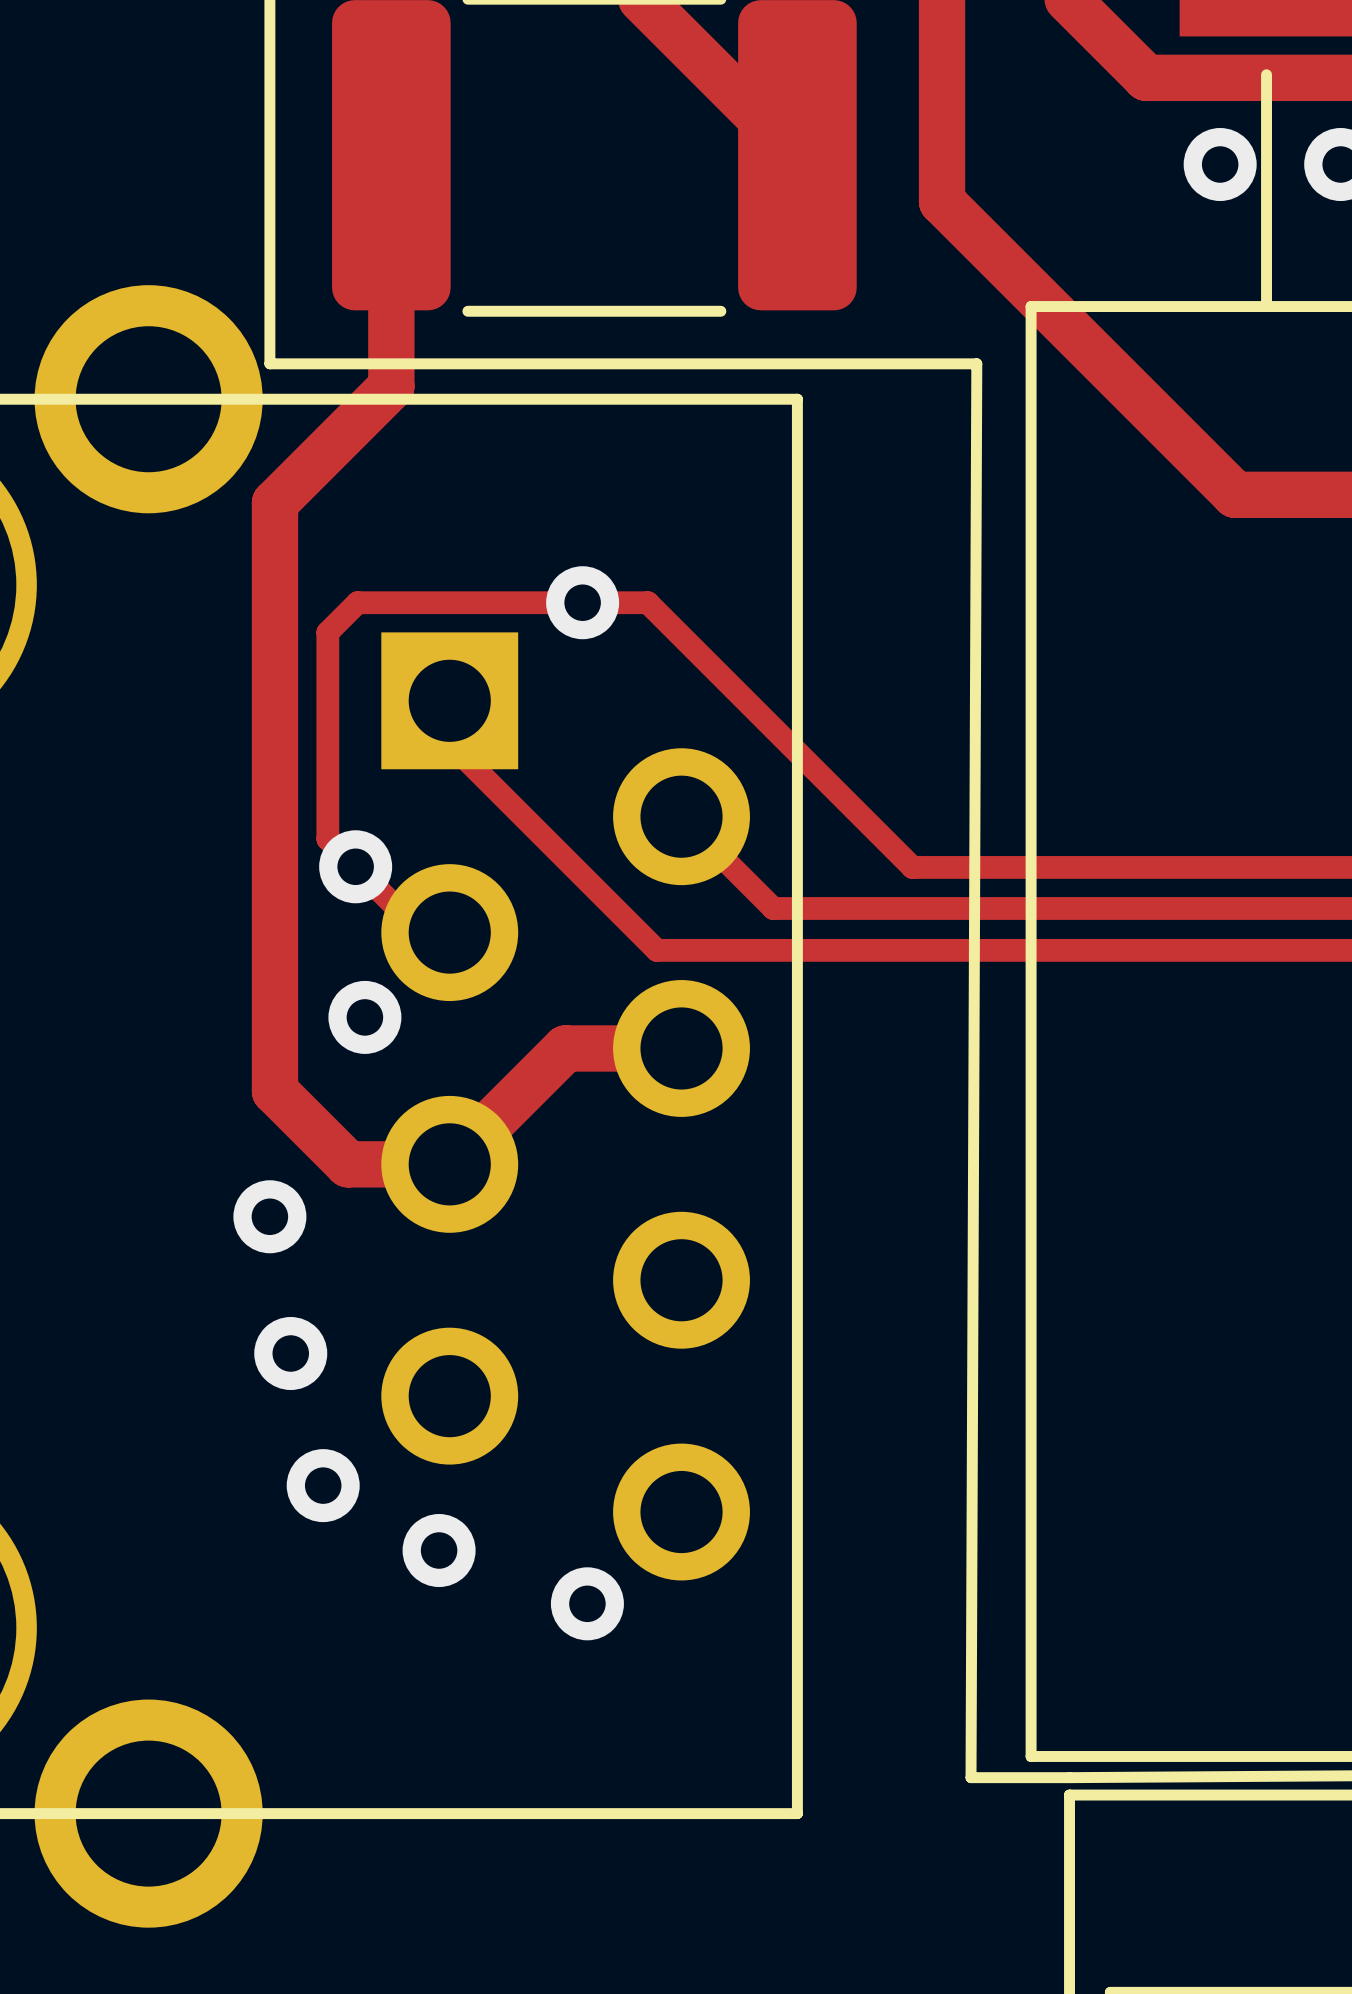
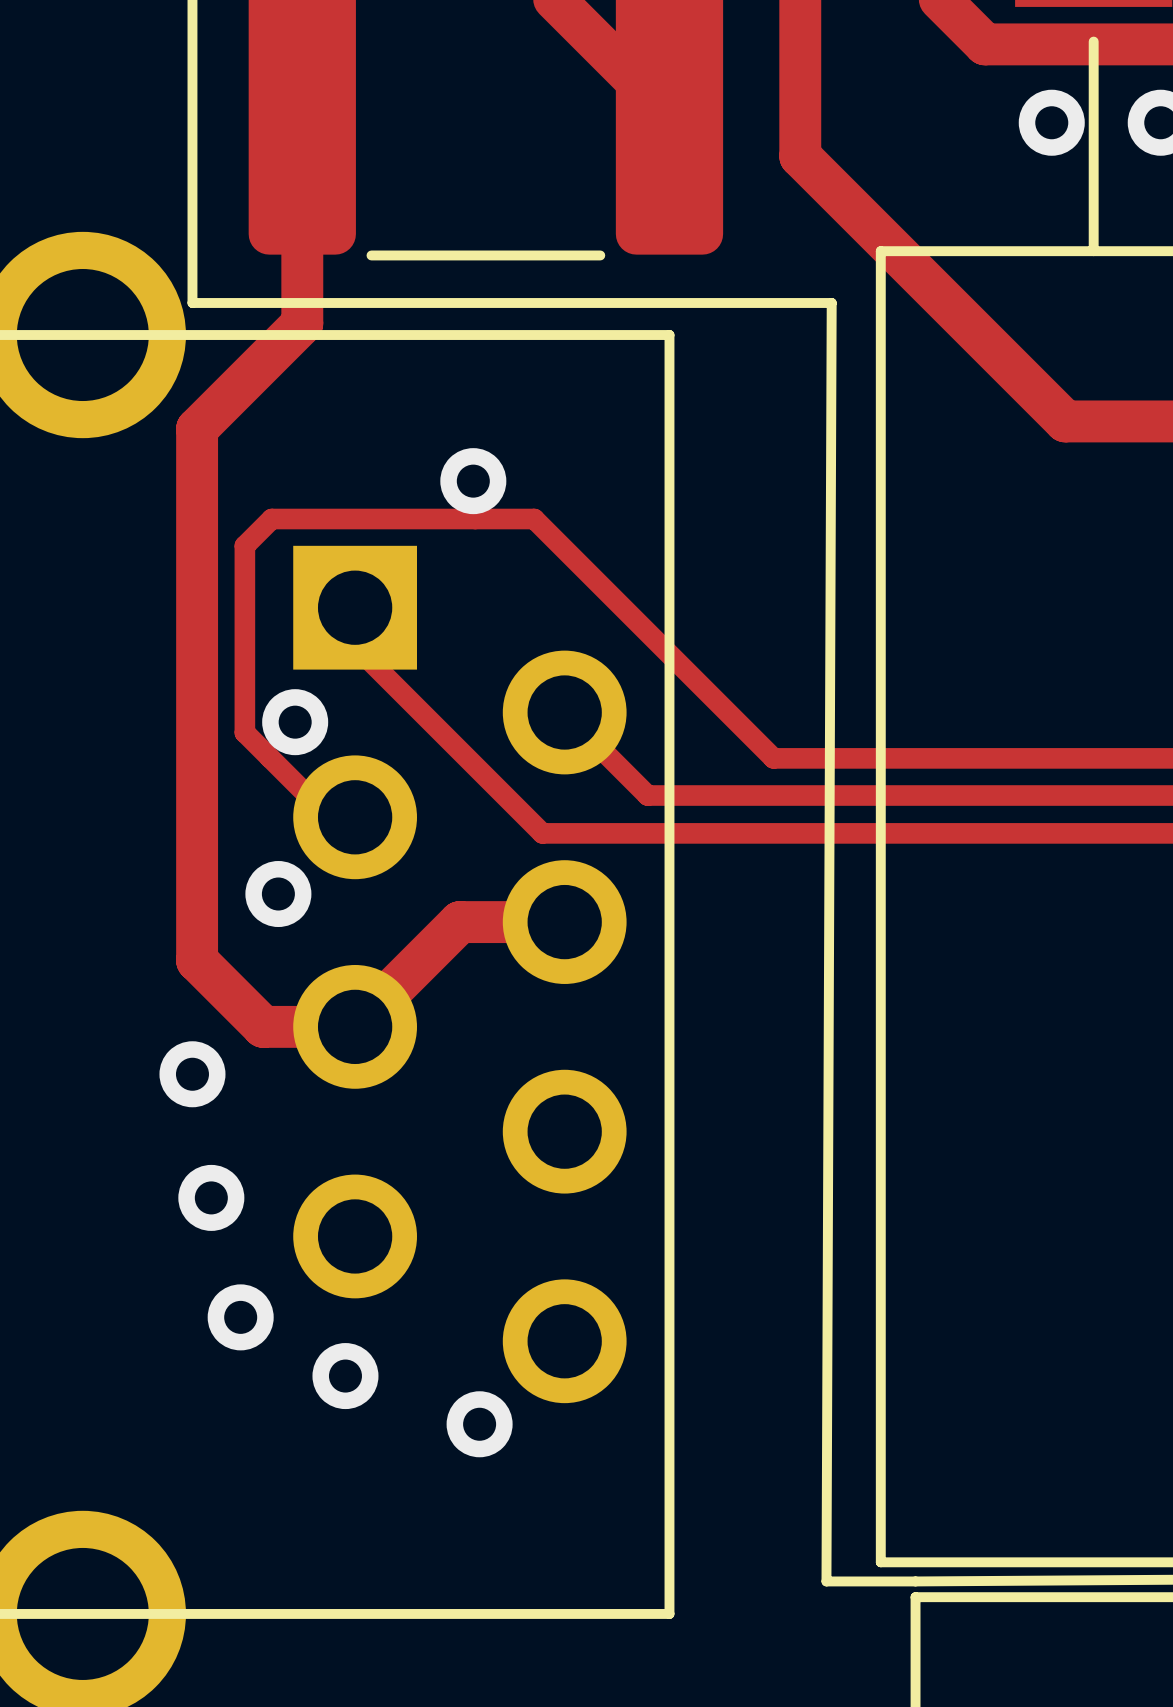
via position: (582, 602) -> (473, 481)
via position: (355, 866) -> (295, 722)

